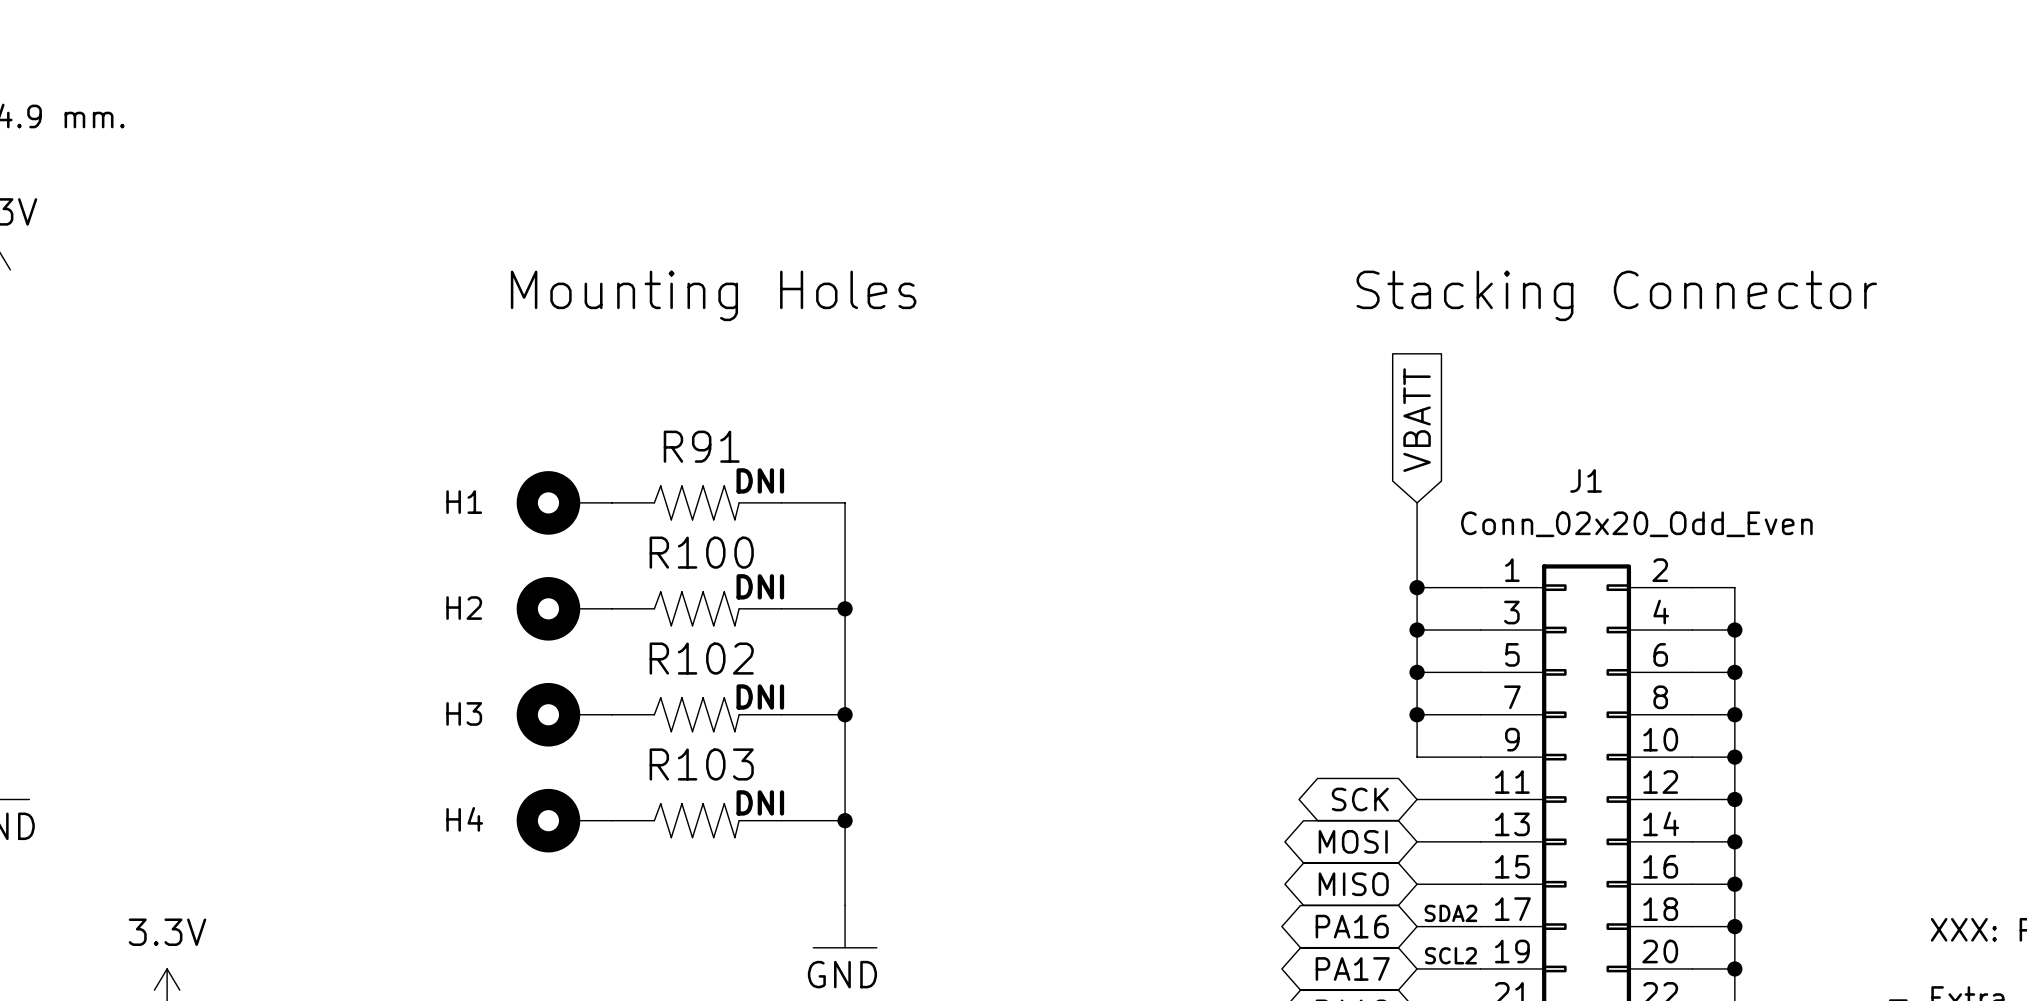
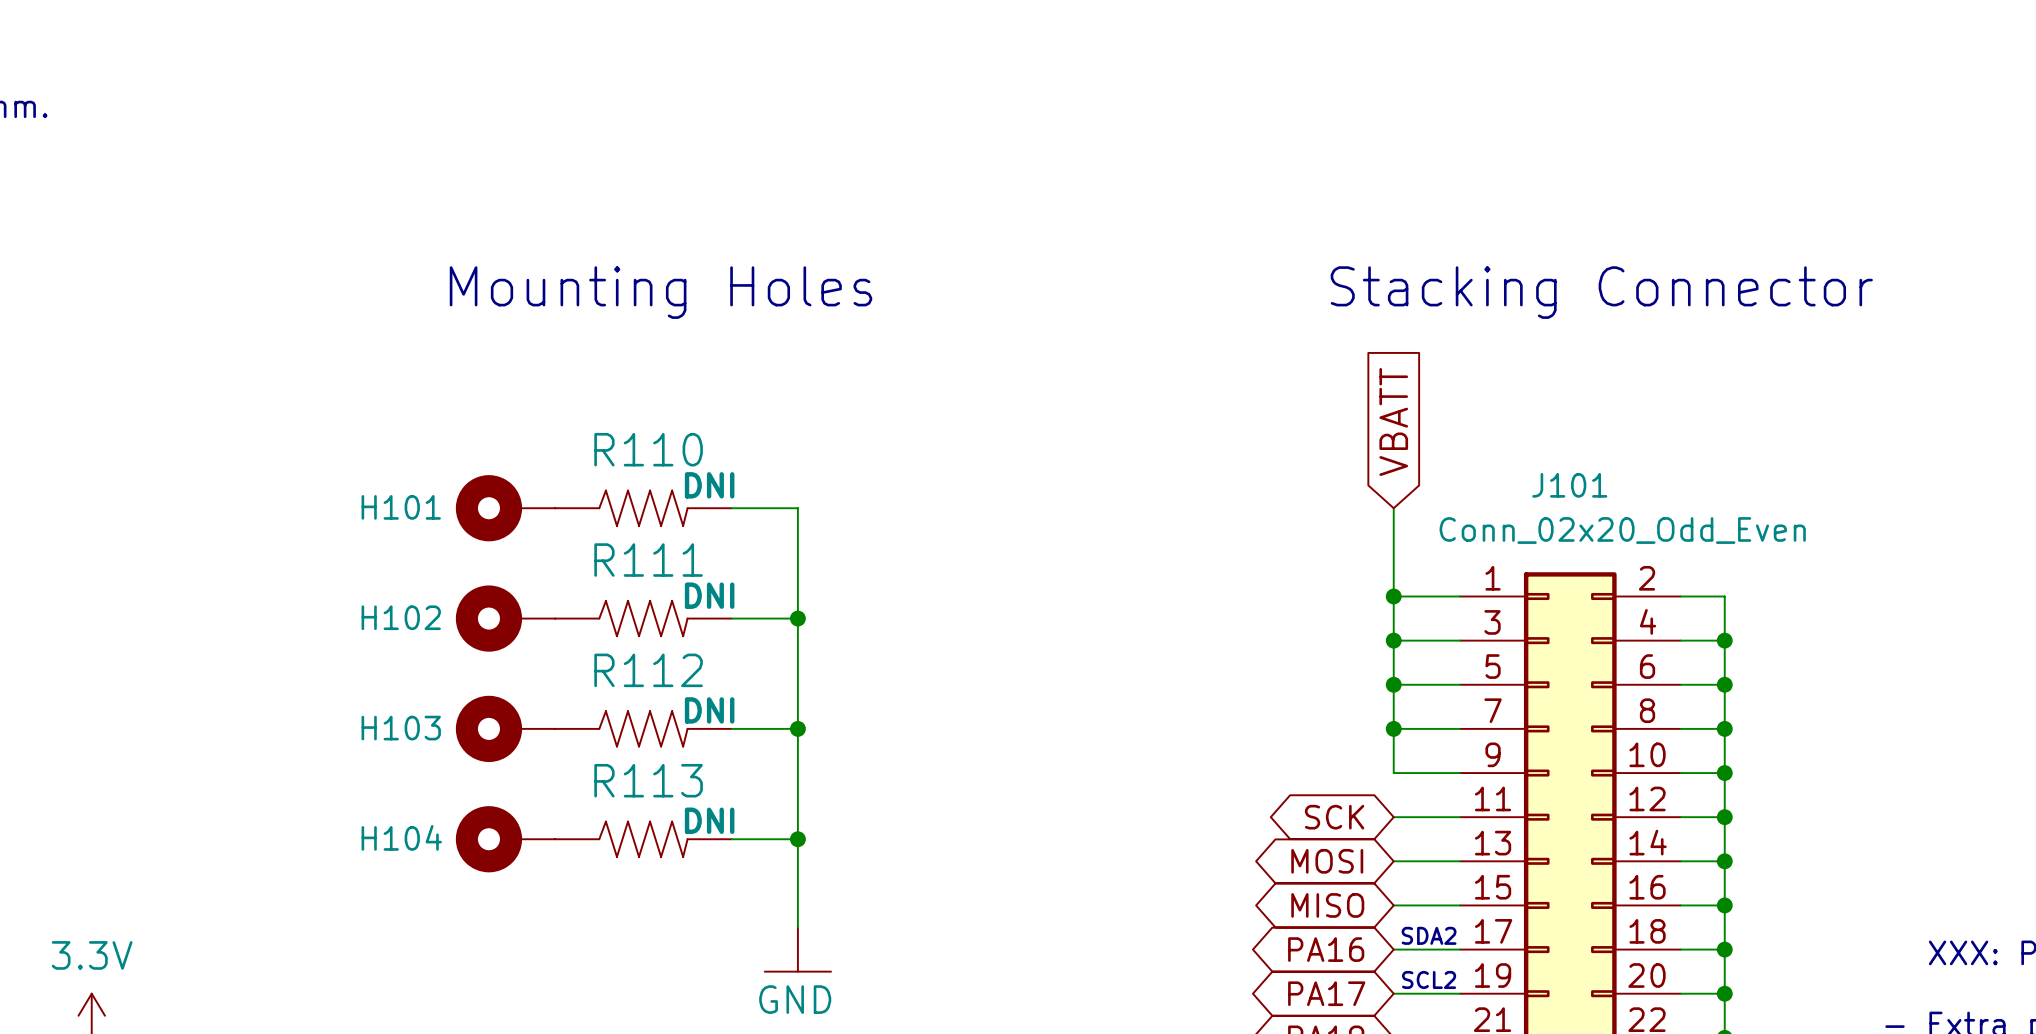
R91 name: R91 (701, 446) -> R110 (648, 449)
J1 name: J1 (1586, 480) -> J101 (1569, 485)
H1 name: H1 (464, 502) -> H101 (401, 507)
R100 name: R100 (701, 552) -> R111 (648, 560)
H2 name: H2 (464, 608) -> H102 (401, 617)
R102 name: R102 (701, 658) -> R112 (648, 670)
H3 name: H3 (464, 713) -> H103 (401, 728)
R103 name: R103 (701, 764) -> R113 (648, 780)
H4 name: H4 (464, 819) -> H104 (401, 837)

